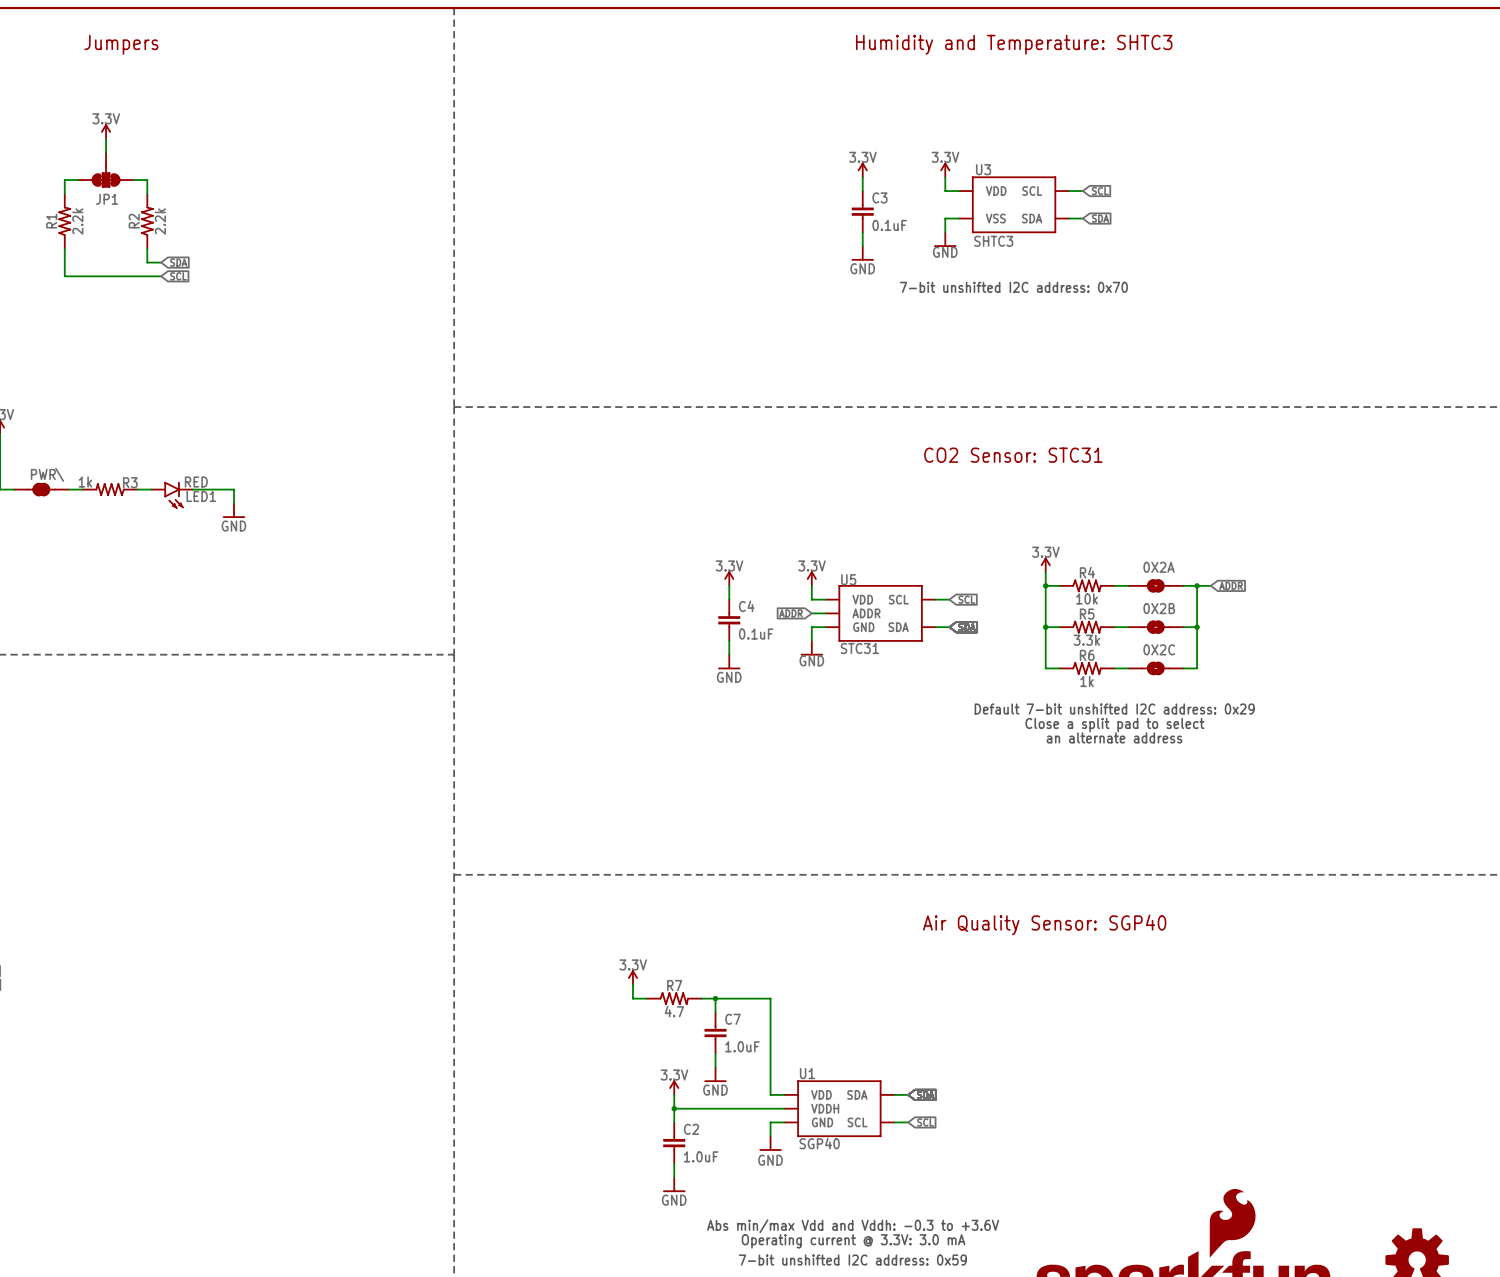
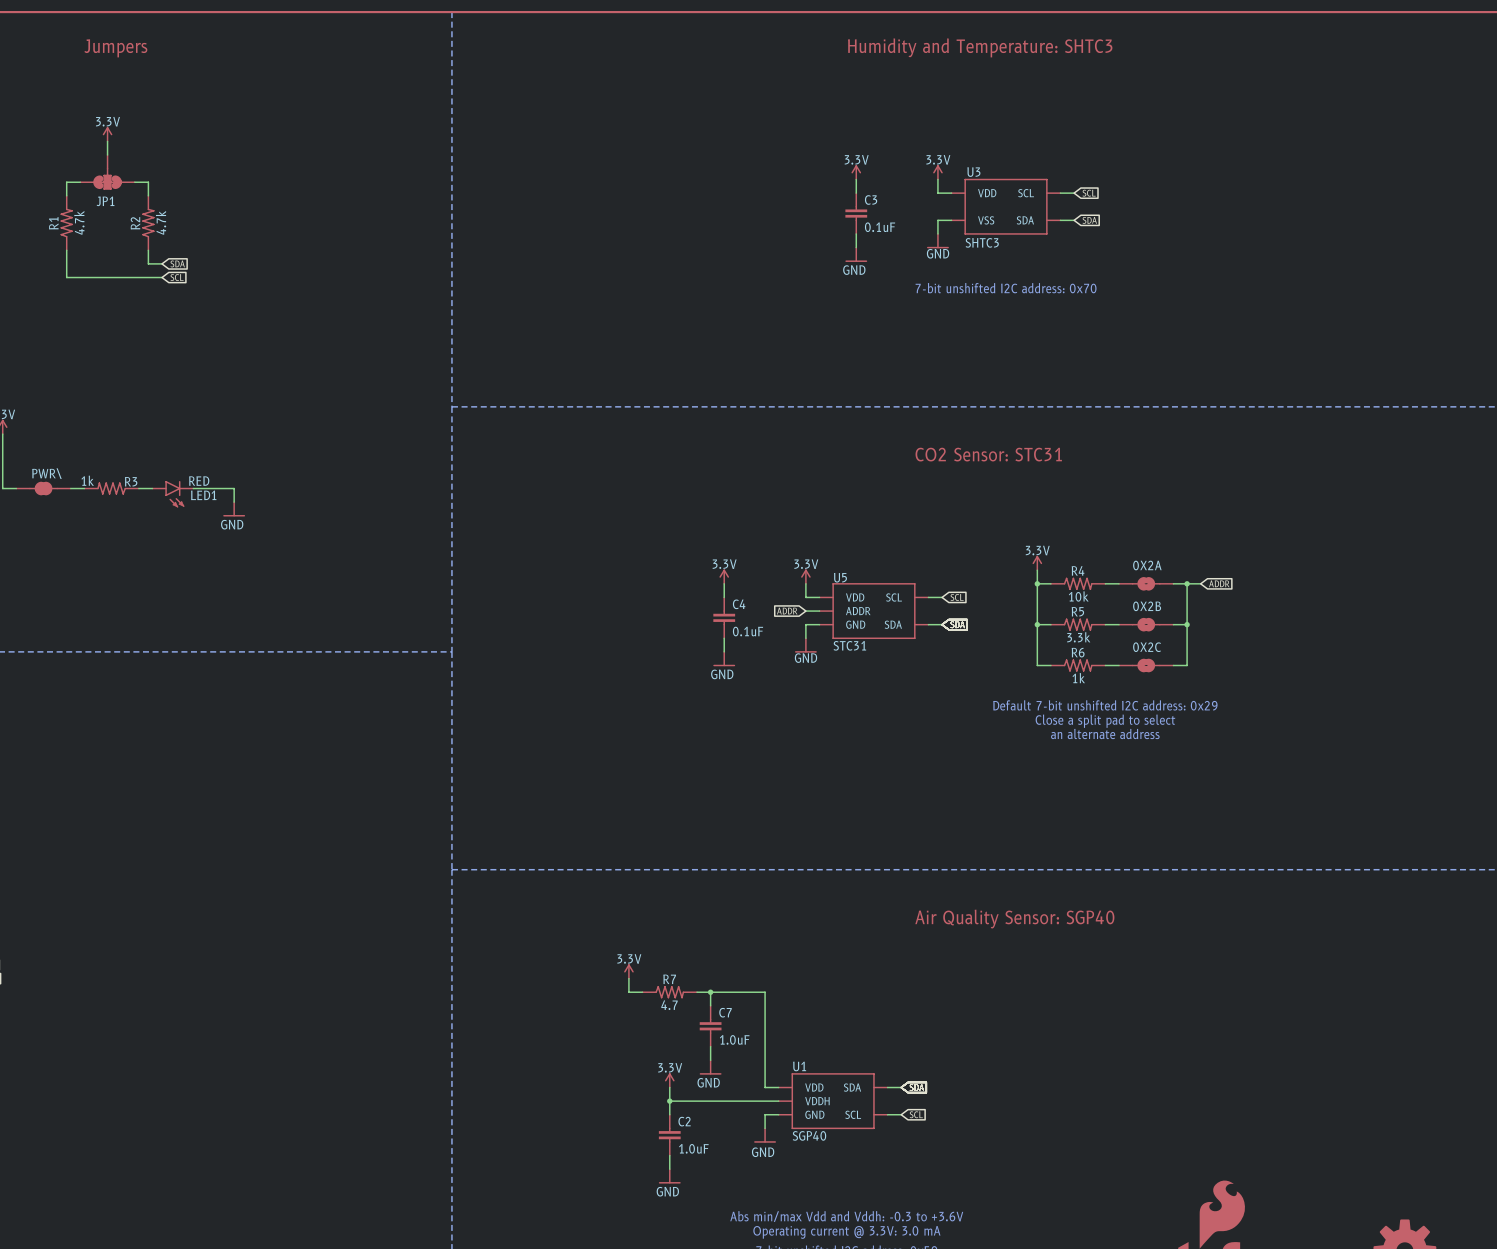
R1 value: 2.2k (77, 221) -> 4.7k (79, 222)
R2 value: 2.2k (160, 221) -> 4.7k (161, 222)

